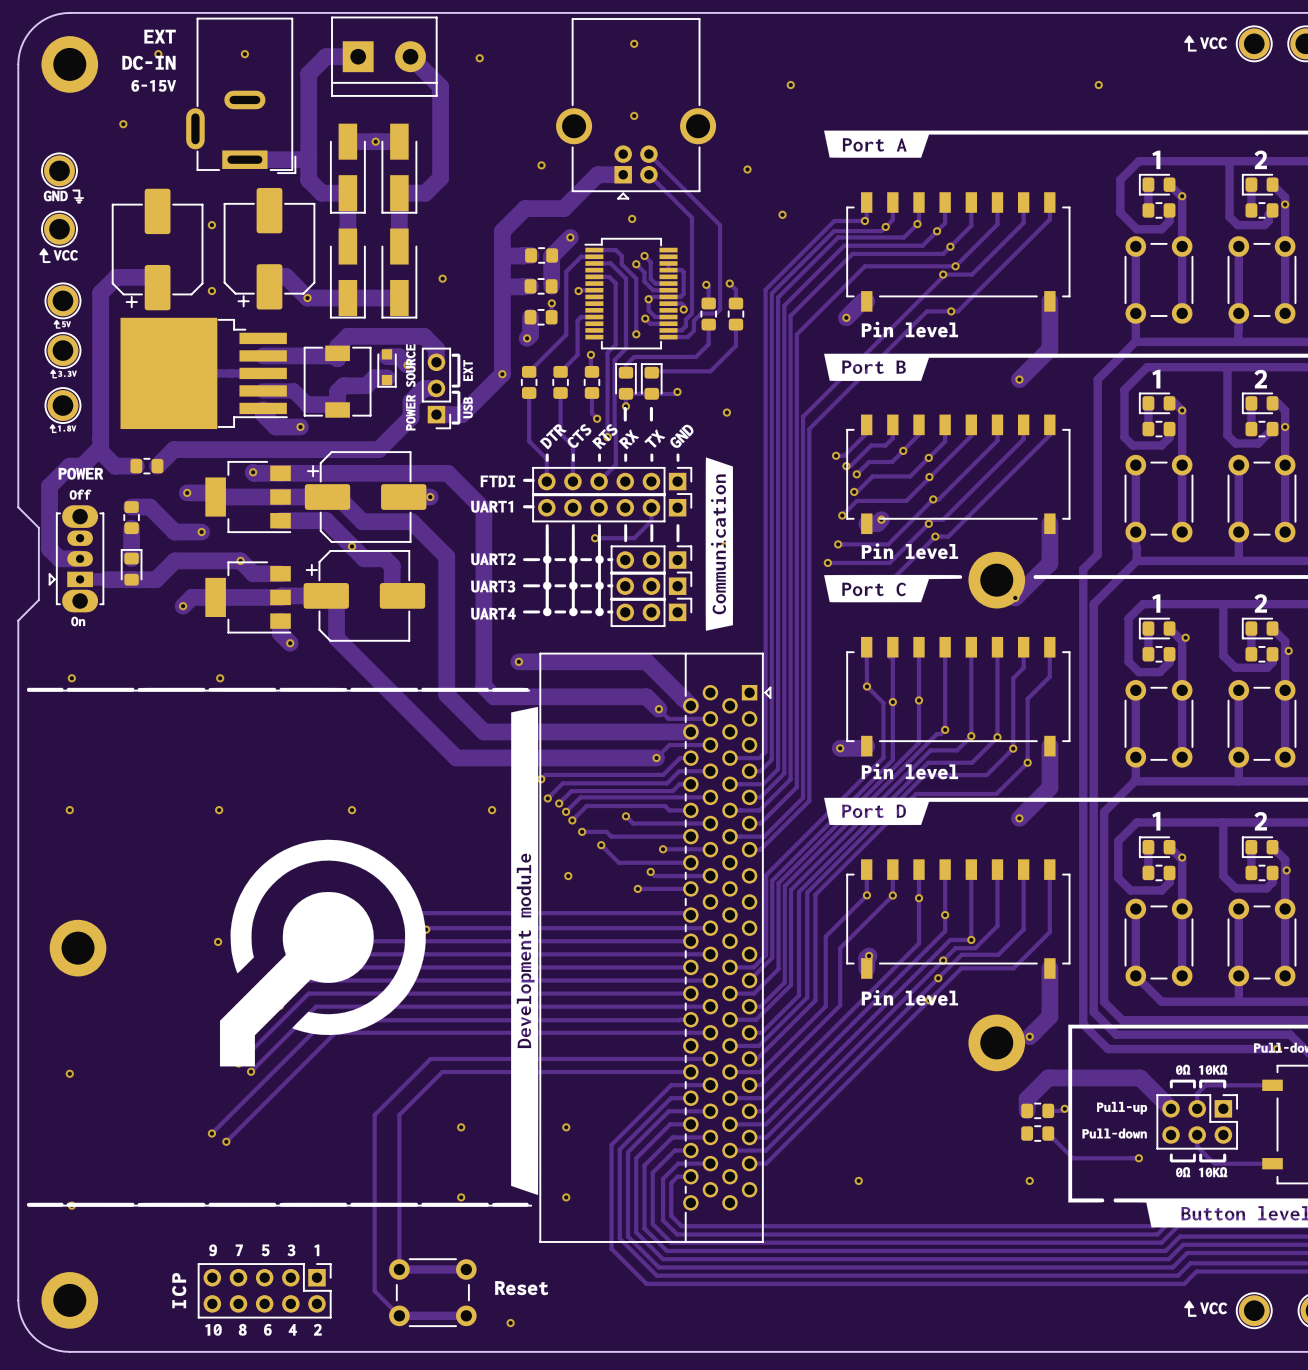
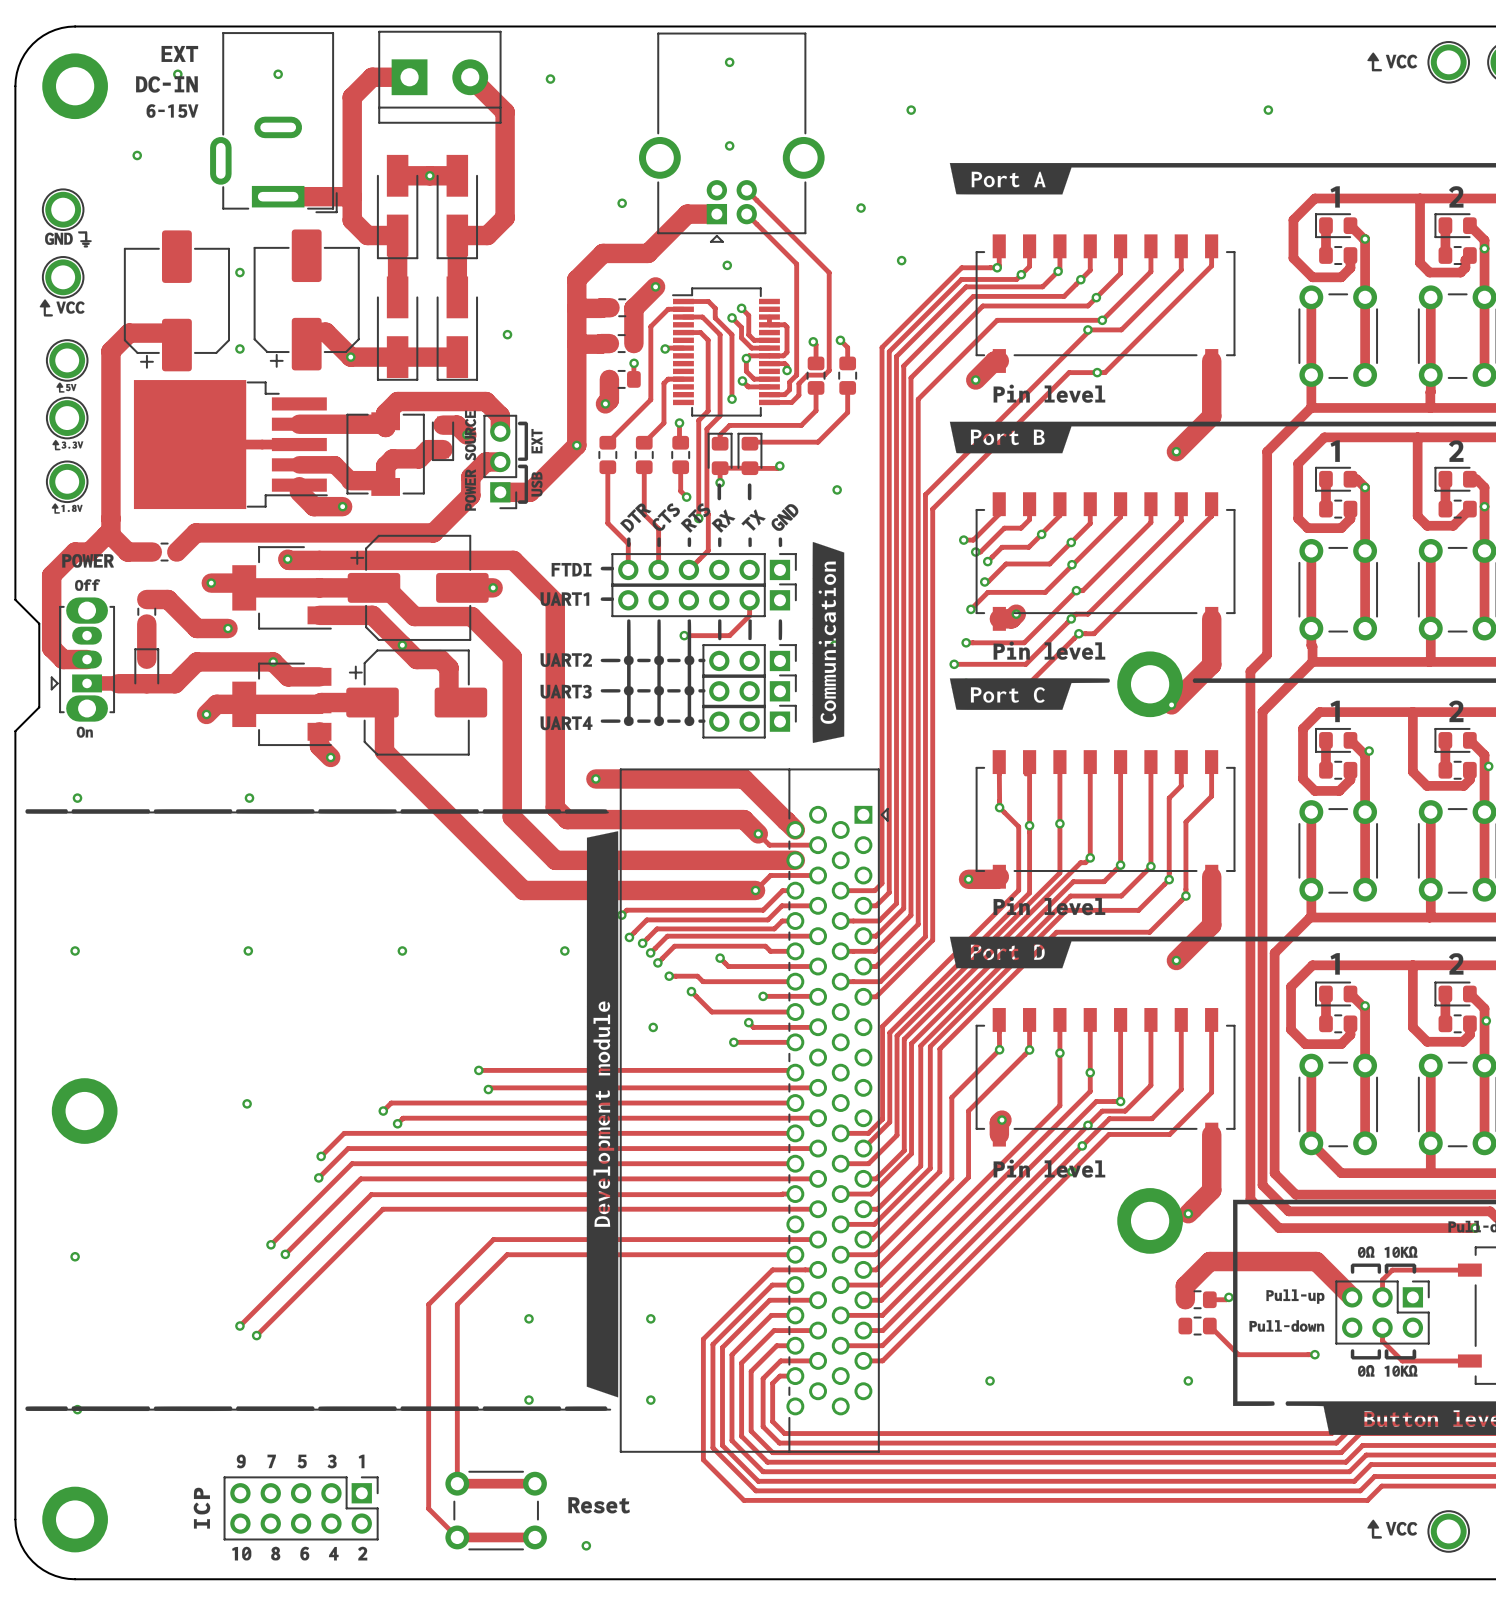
drawing: [219, 839, 426, 1067] -> none

